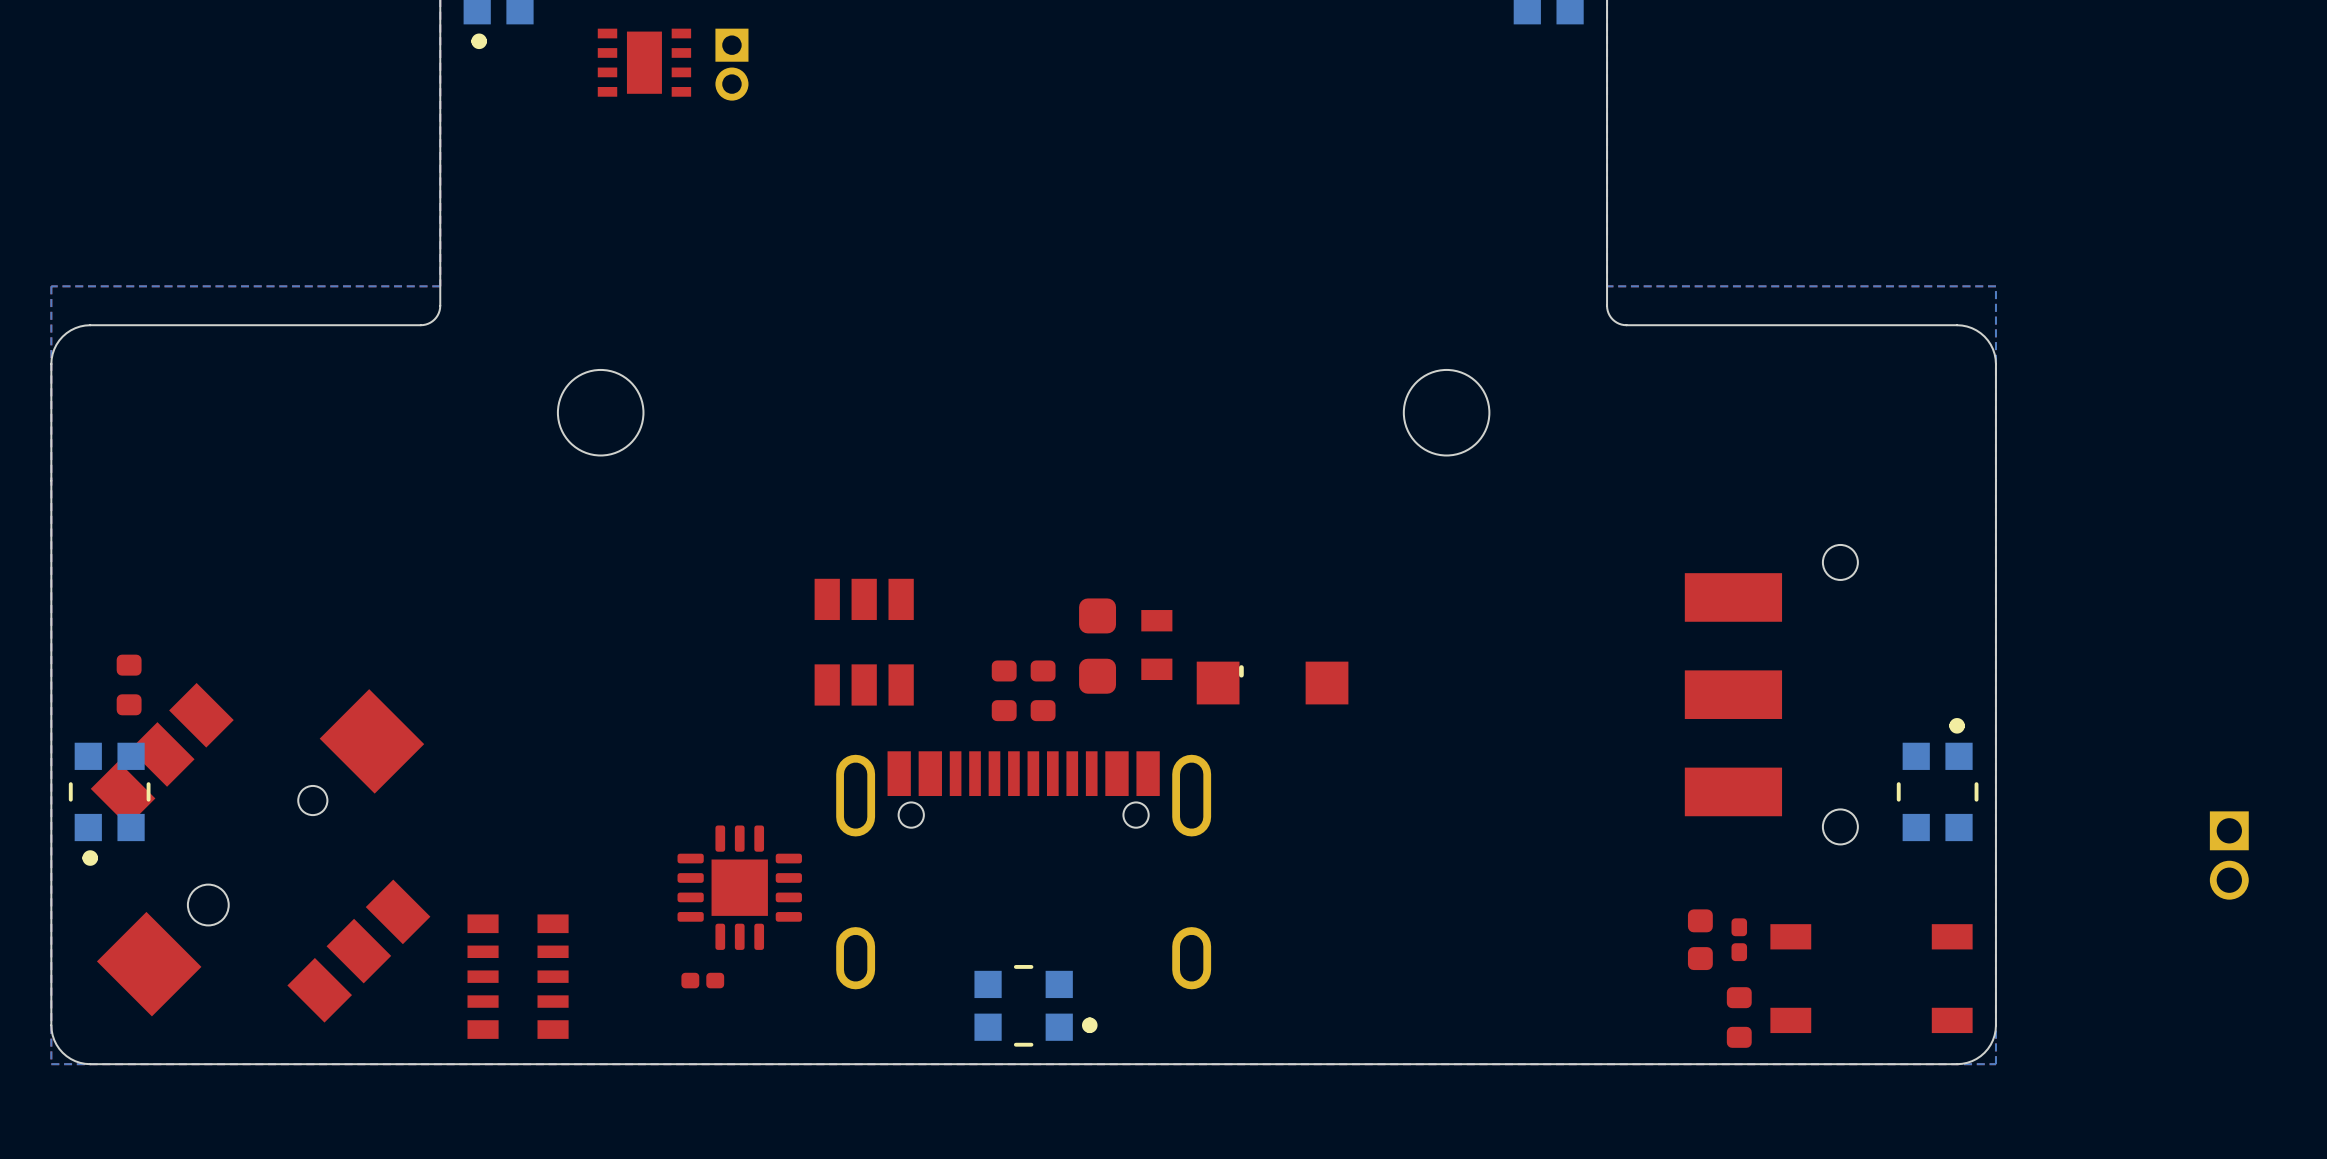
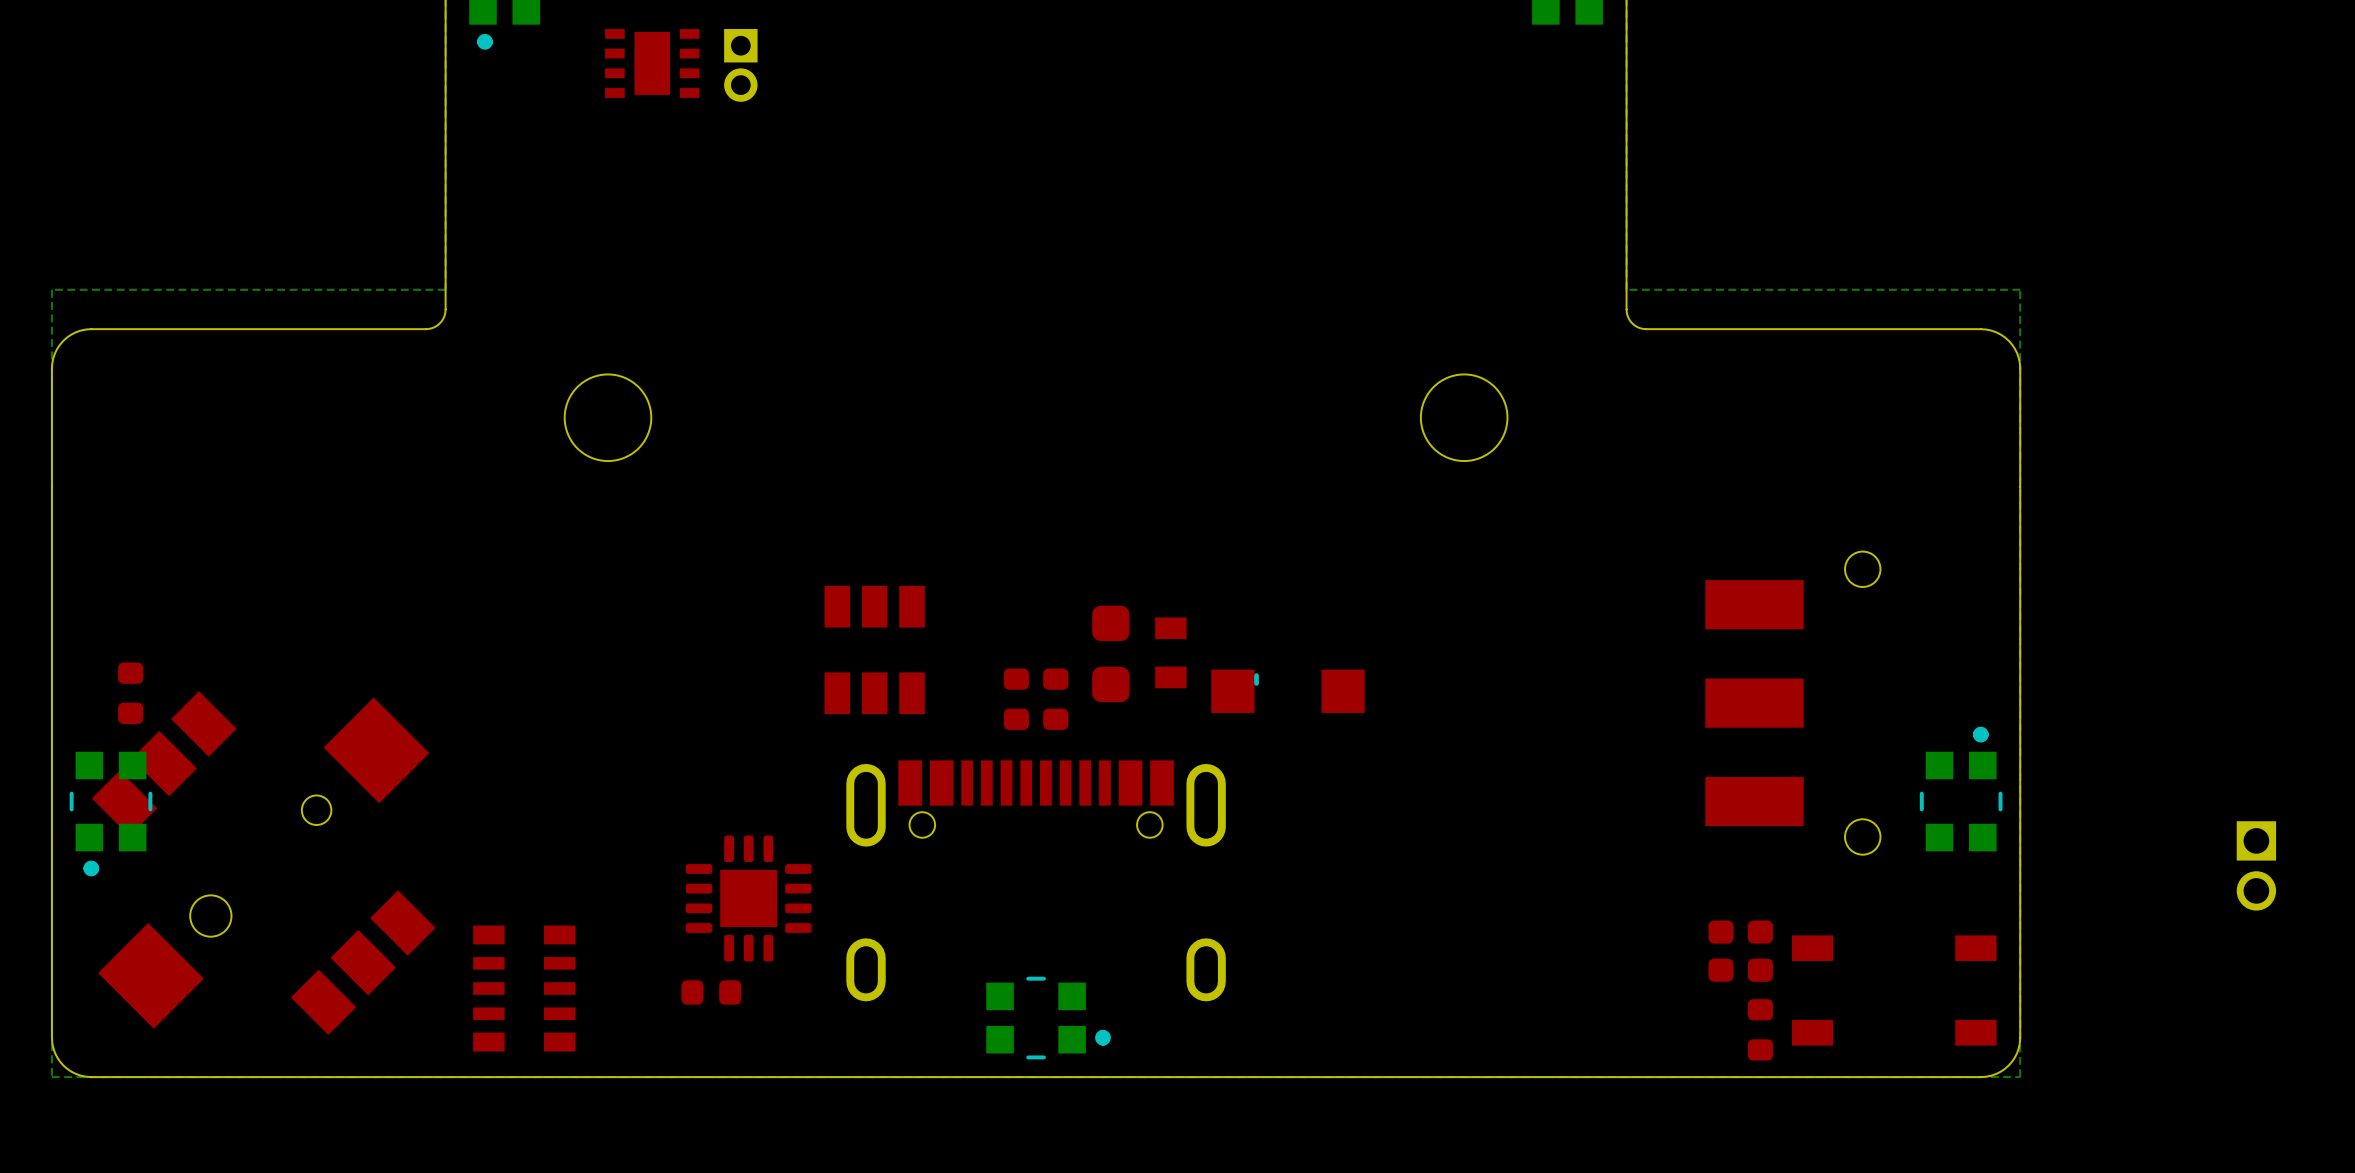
part footprint: [1731, 918, 1748, 962] -> [1747, 920, 1774, 982]
part footprint: [681, 972, 725, 989] -> [681, 980, 742, 1005]

